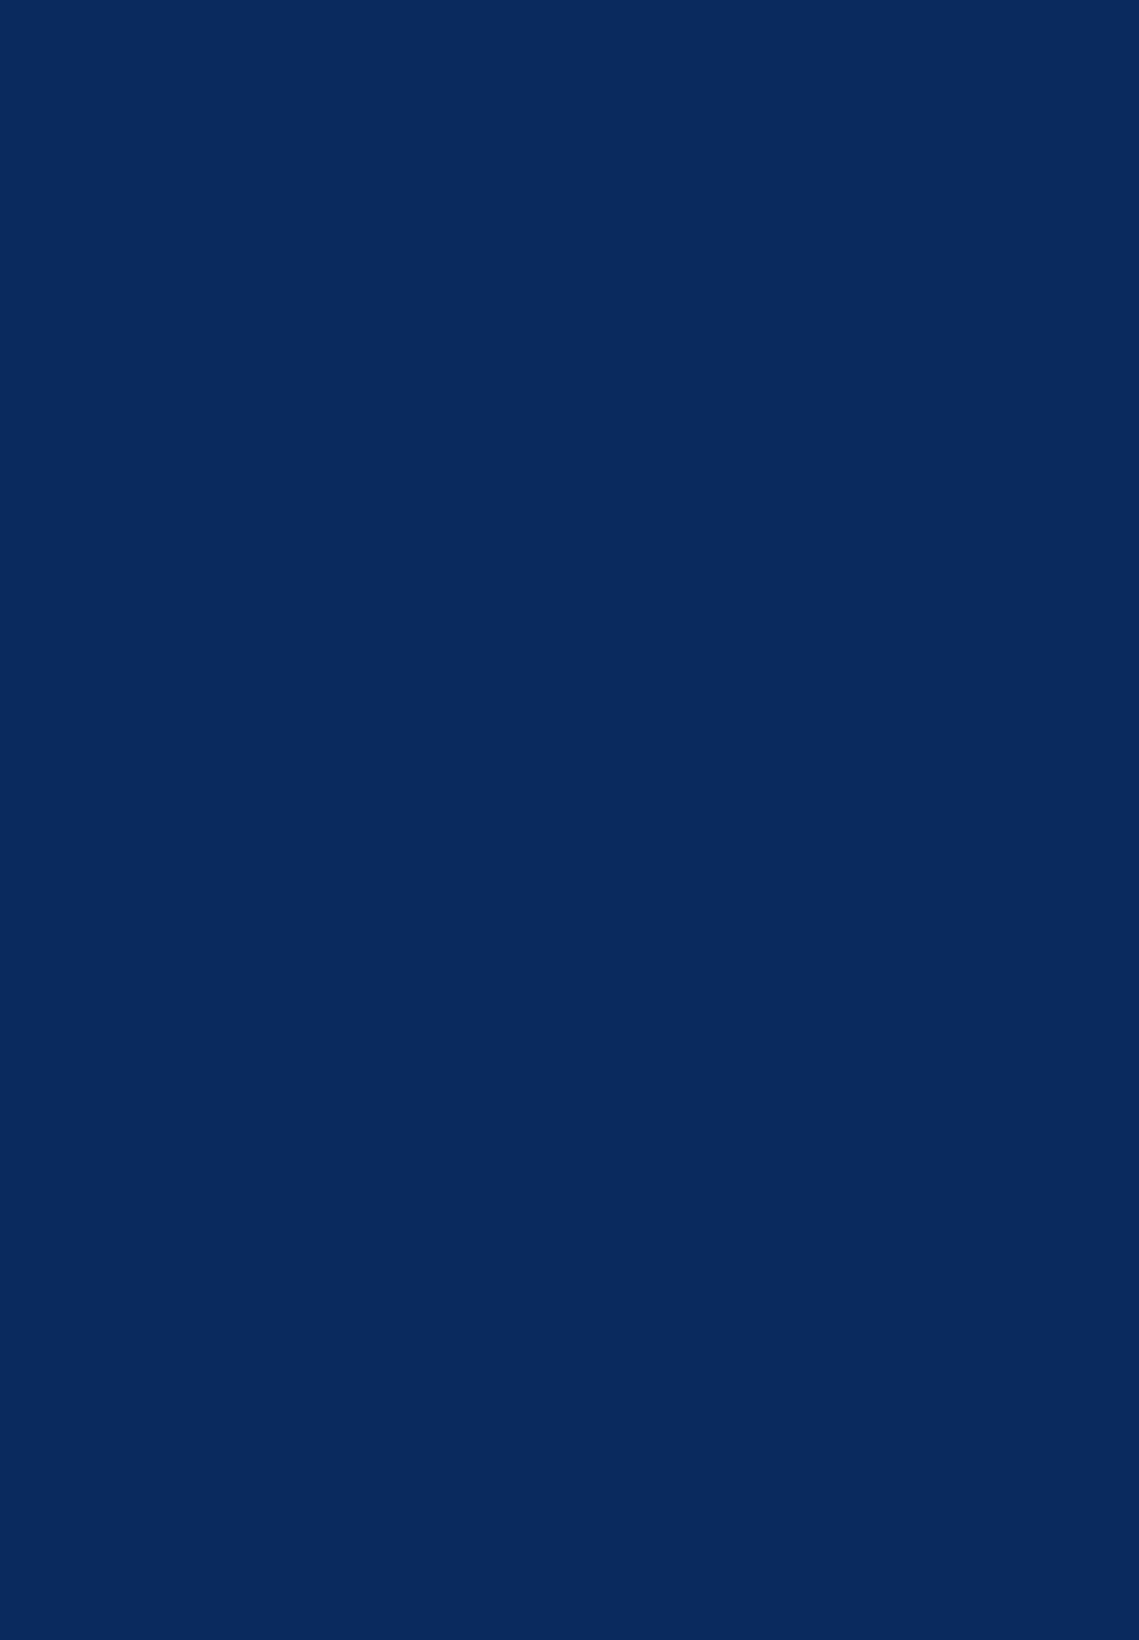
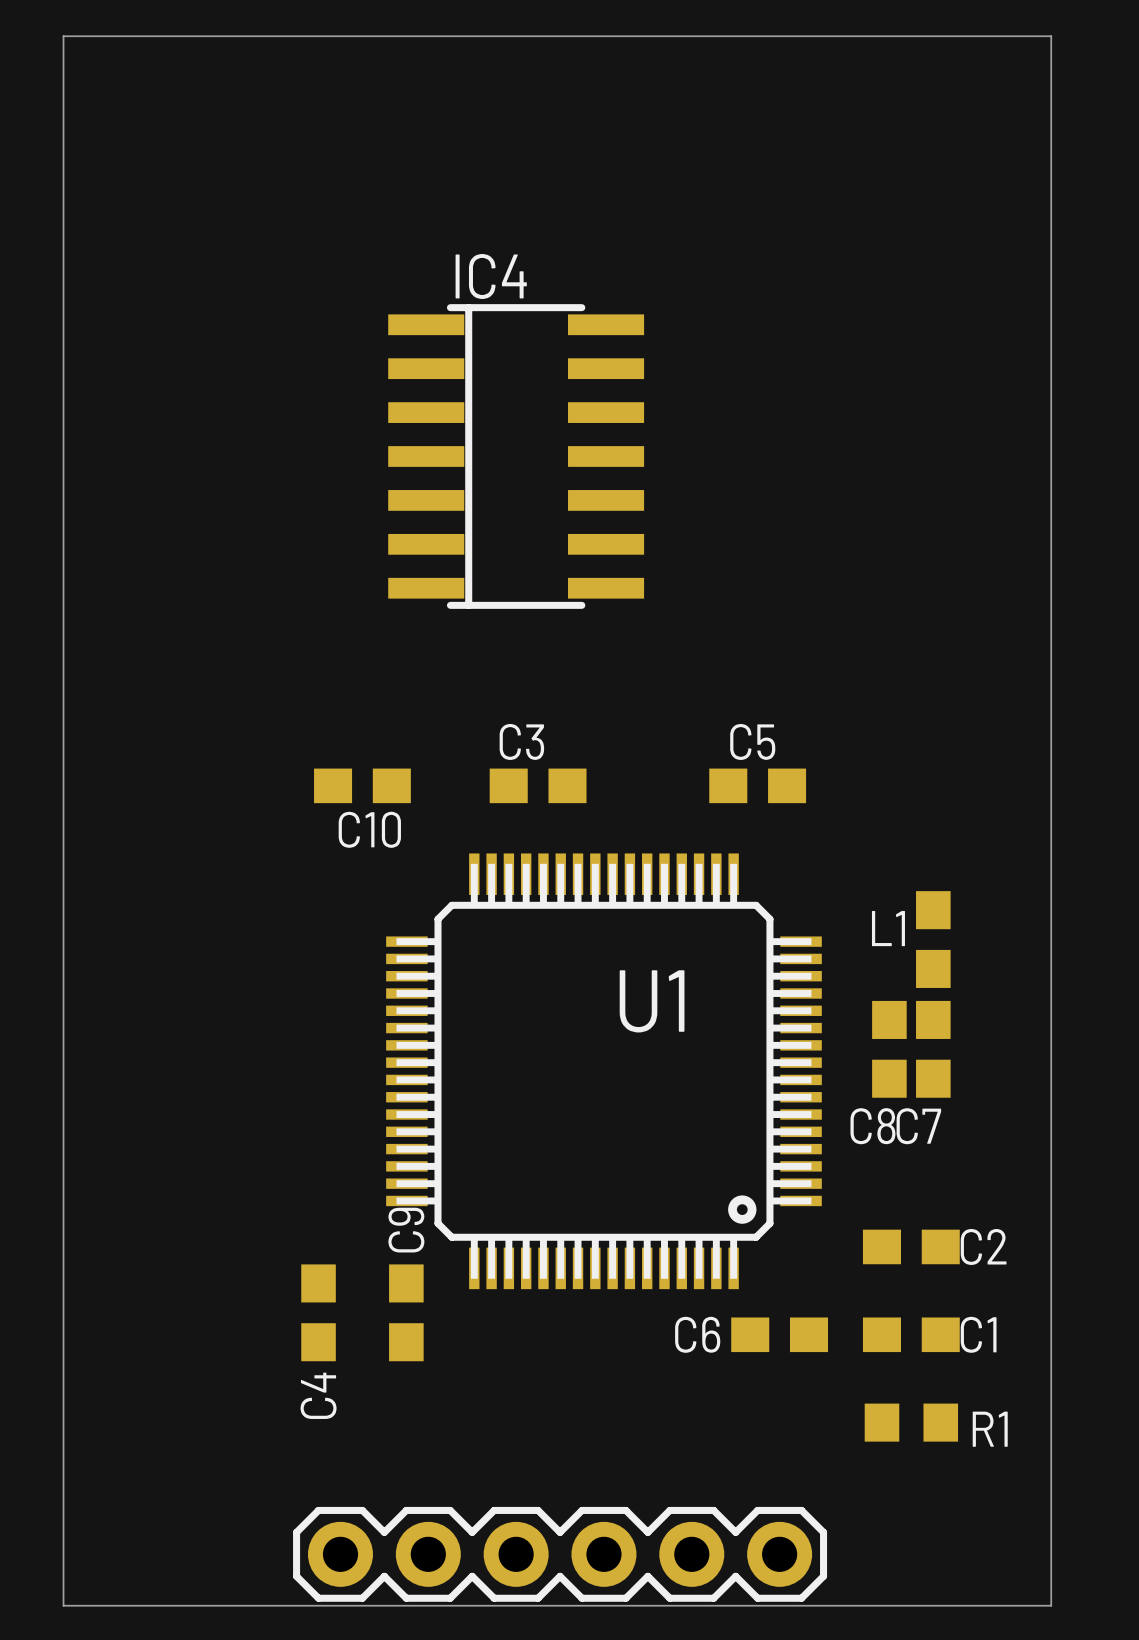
board edge: none -> (63, 36) (63, 1605) (1051, 1605) (1051, 36) (63, 36)
IC4: none -> (516, 456)
C10: none -> (362, 785)
C3: none -> (538, 785)
C5: none -> (757, 785)
L1: none -> (933, 939)
C8: none -> (889, 1049)
C7: none -> (933, 1049)
U1: none -> (603, 1071)
C2: none -> (911, 1246)
C4: none -> (318, 1312)
C9: none -> (406, 1312)
C6: none -> (779, 1334)
C1: none -> (911, 1334)
R1: none -> (911, 1422)
part: none -> (560, 1554)

